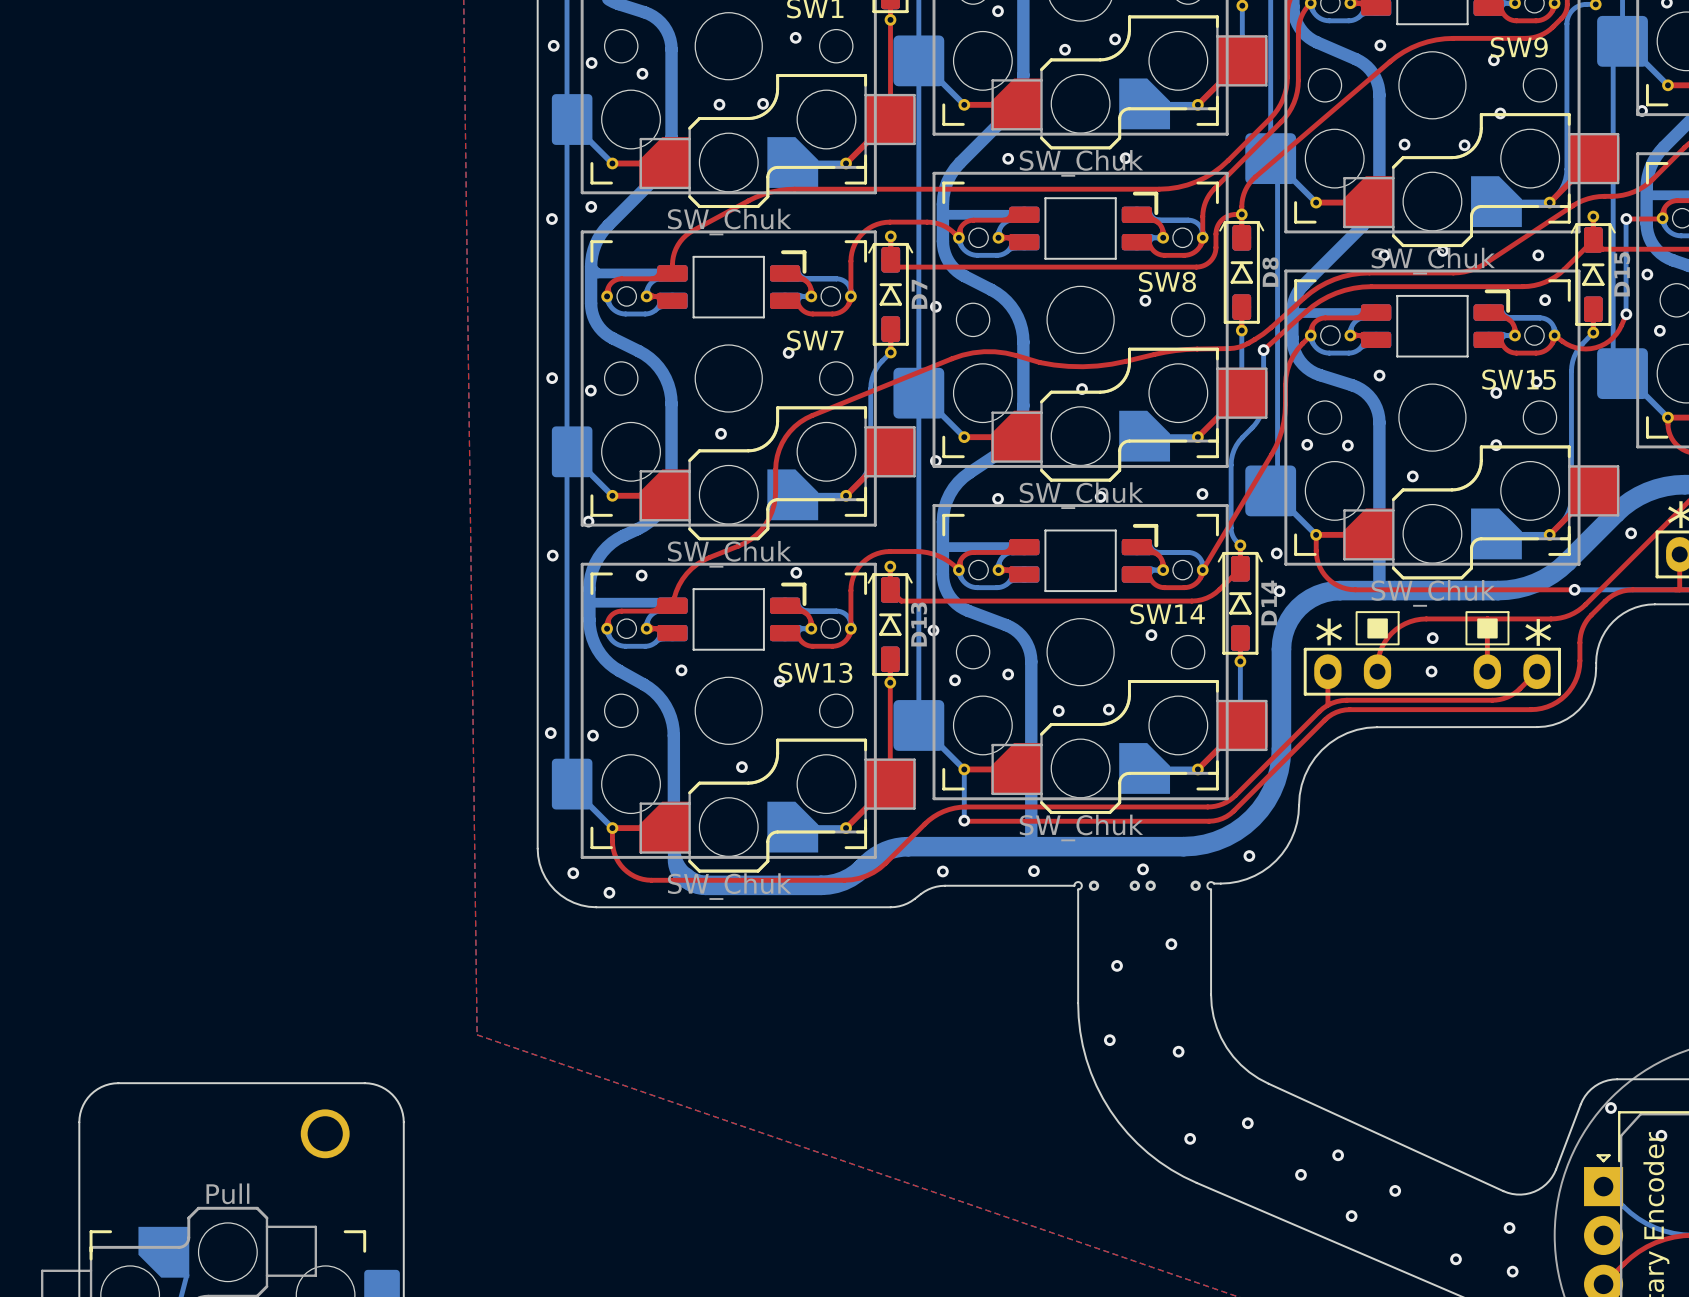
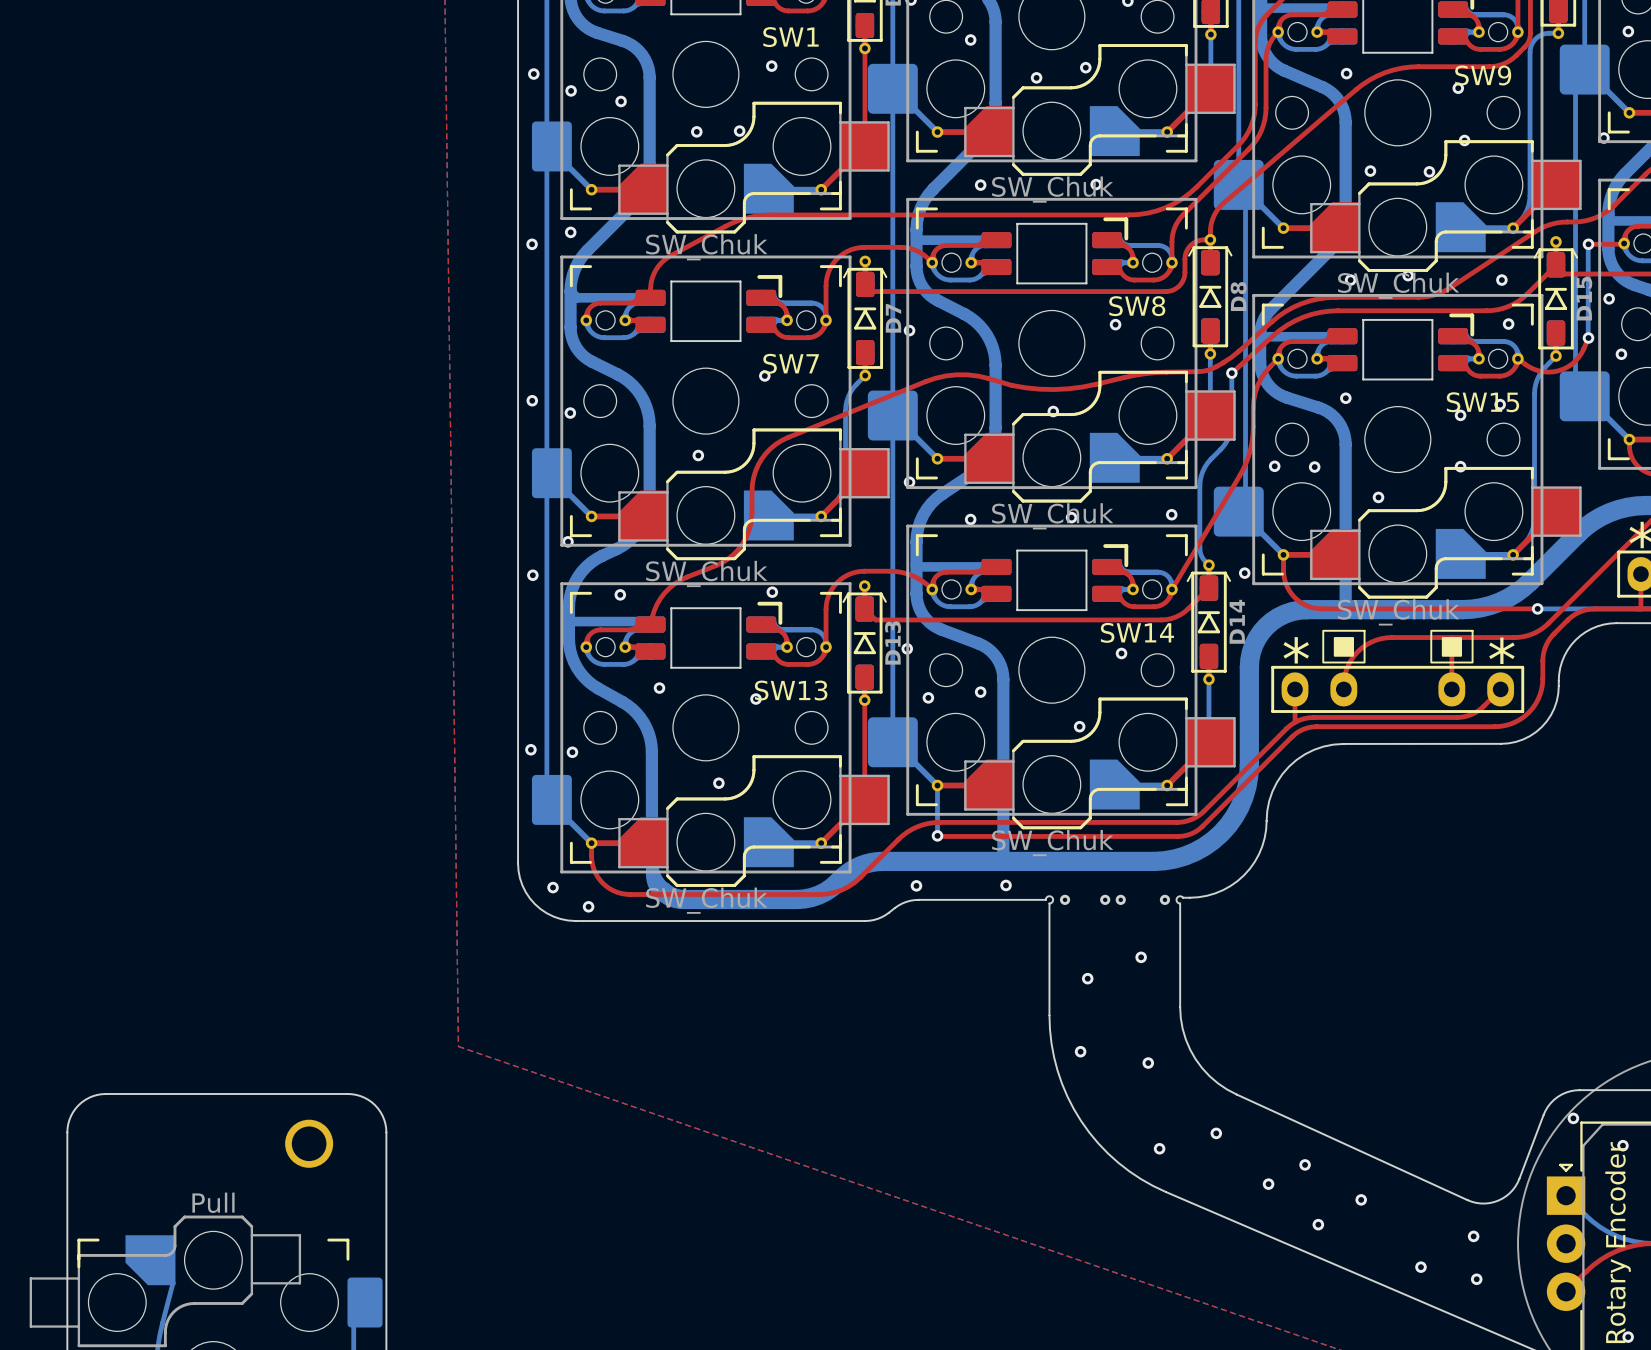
via: (1631, 533) -> none
via: (1279, 591) -> none
via: (1432, 638) -> none
via: (1431, 671) -> none
via: (1058, 711) -> none
via: (1249, 856) -> none
via: (1143, 869) -> none

